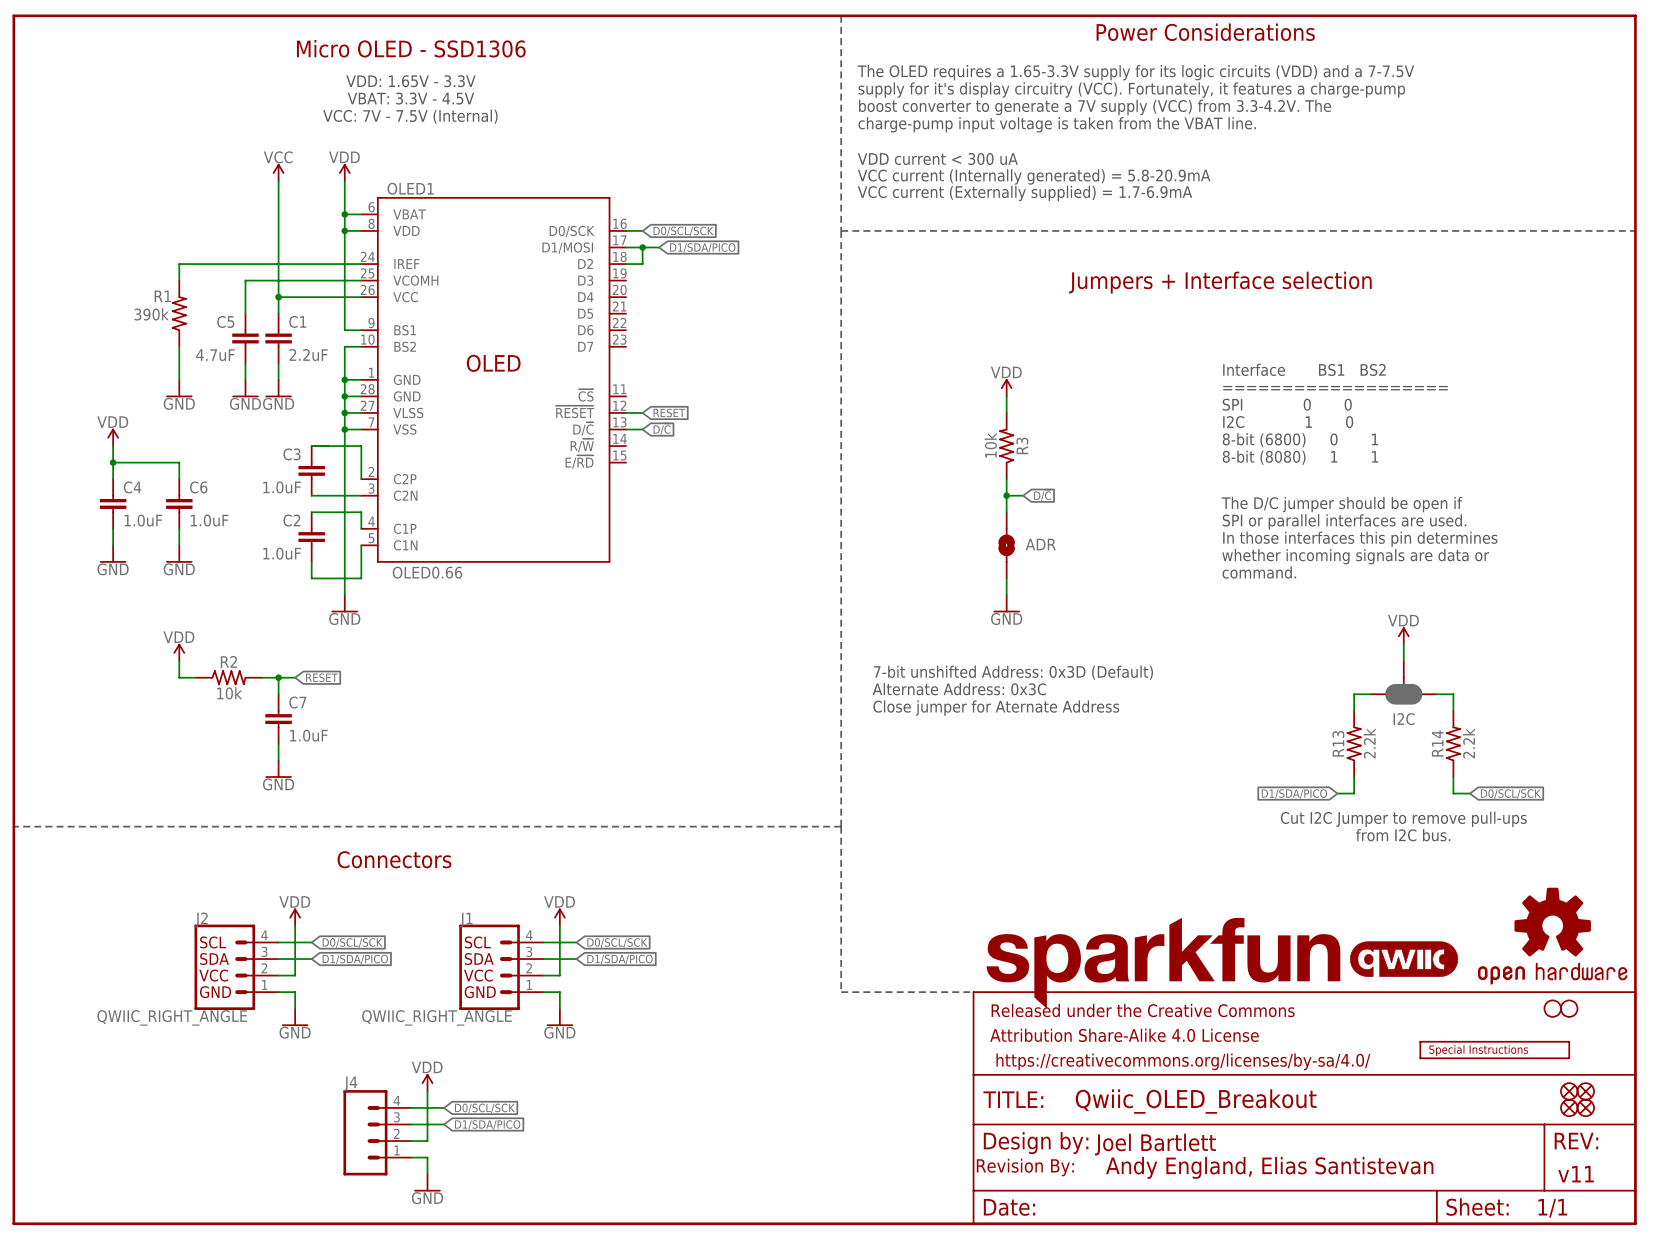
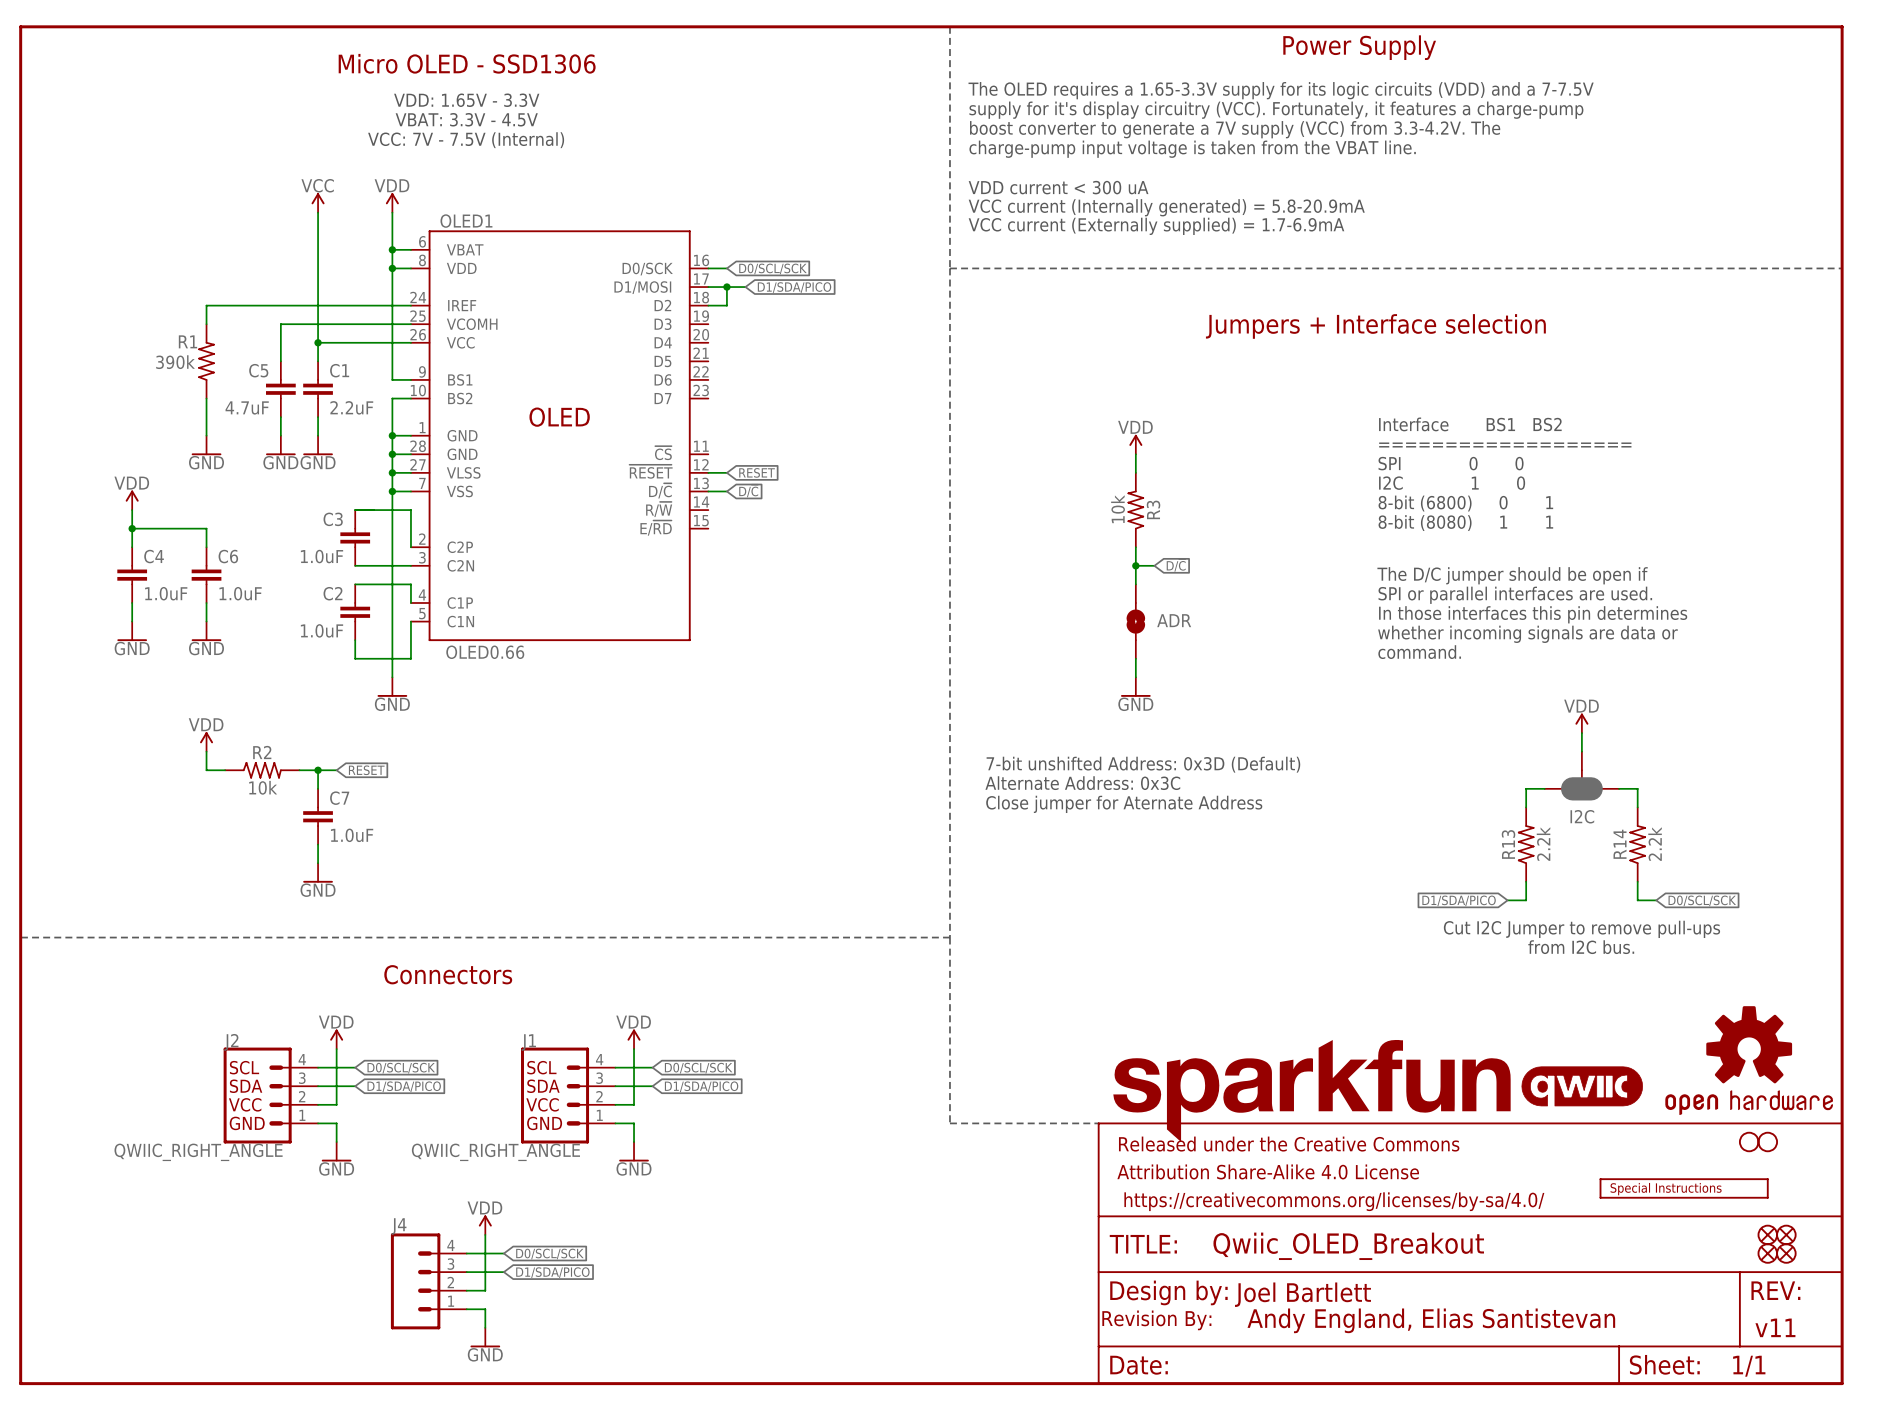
text: Power Considerations (1205, 32) -> Power Supply (1359, 47)

